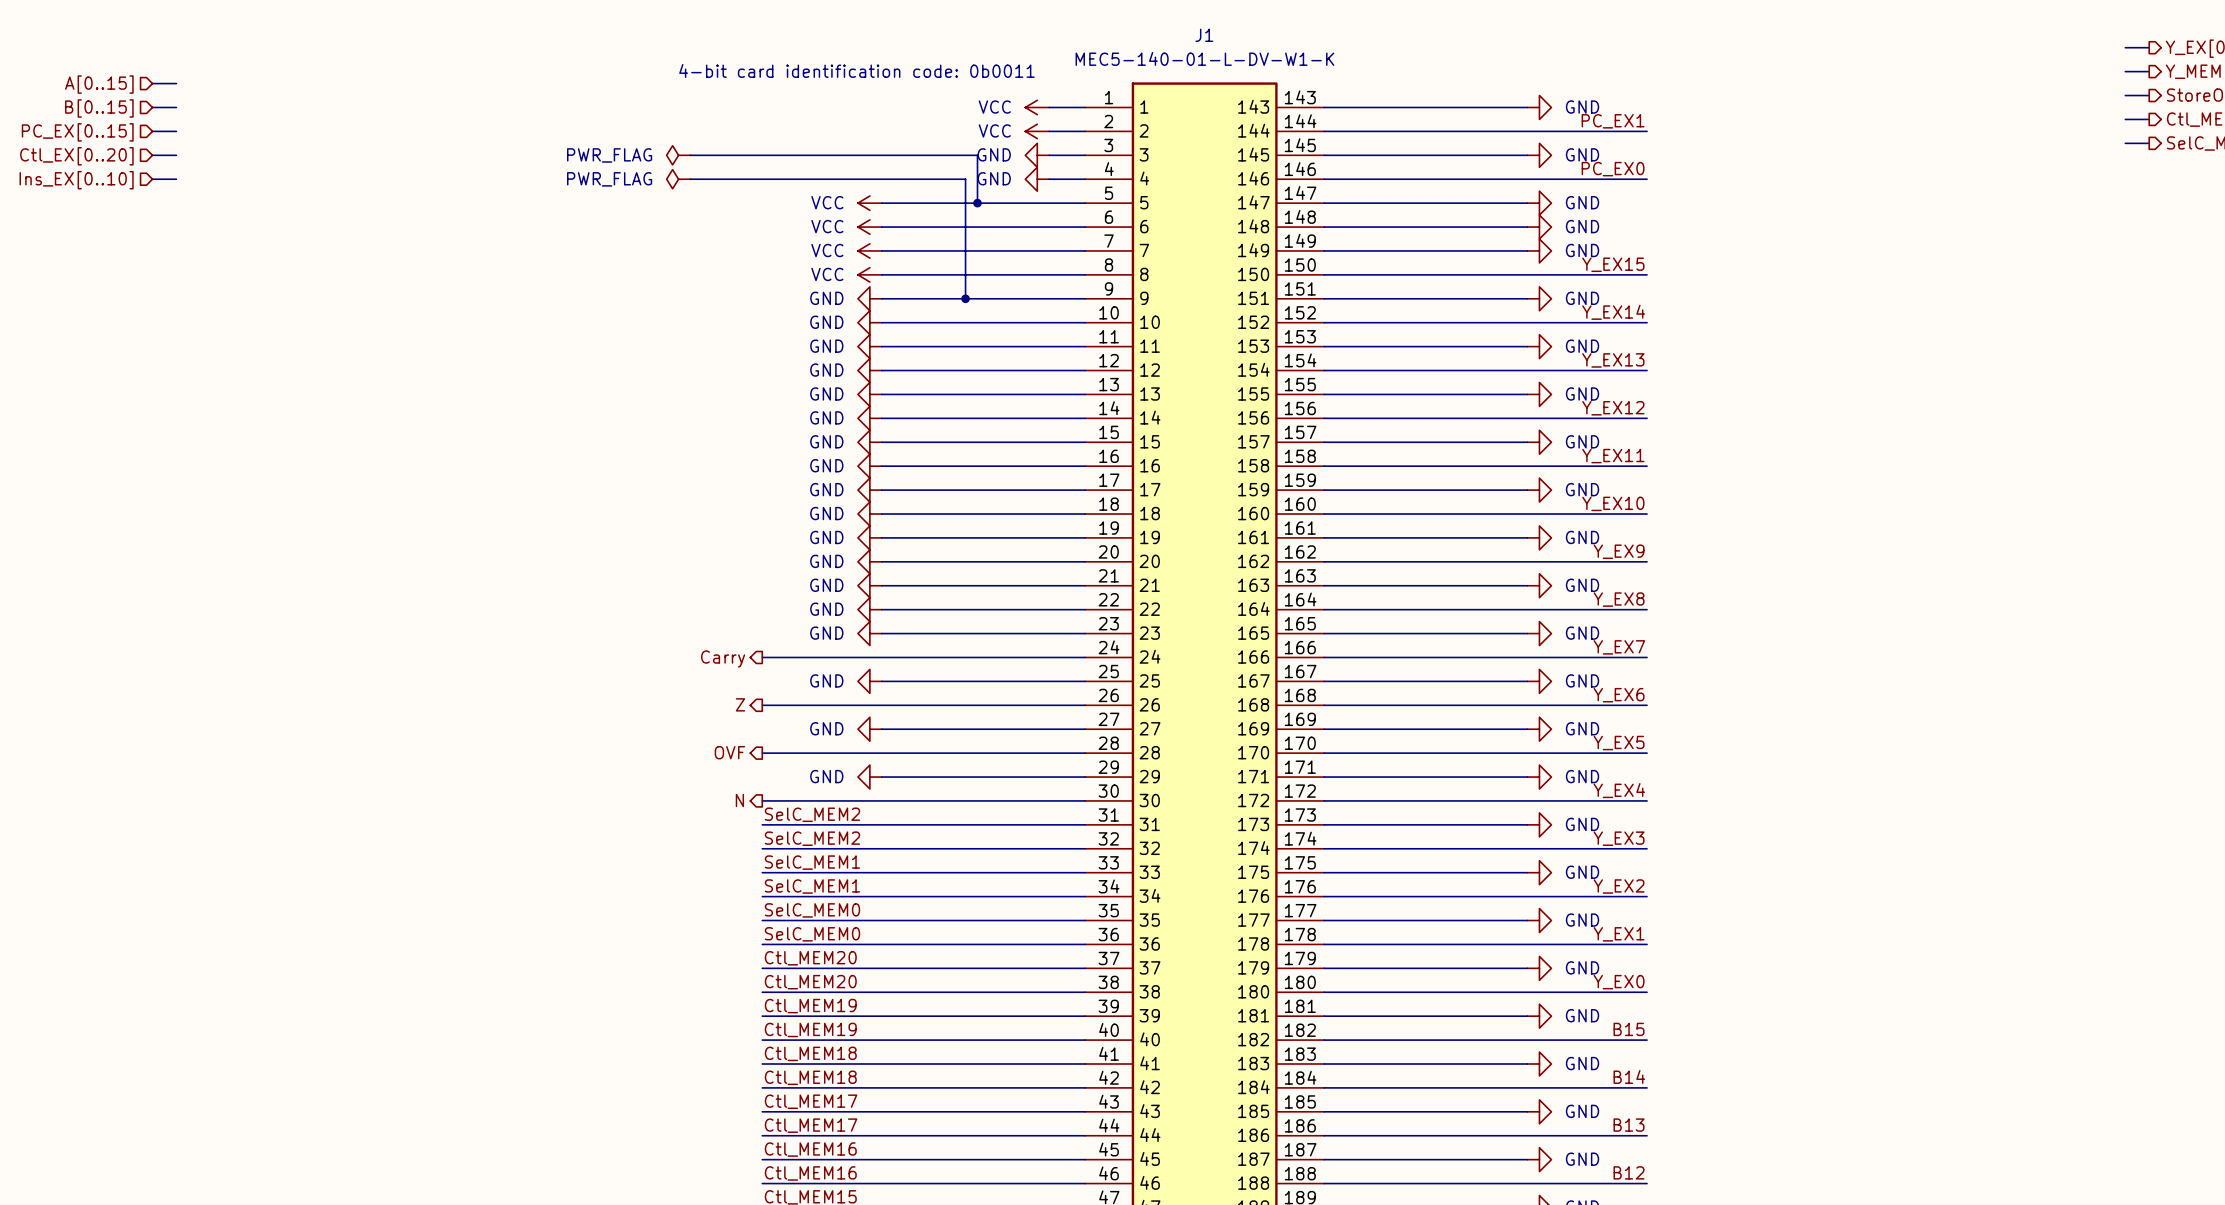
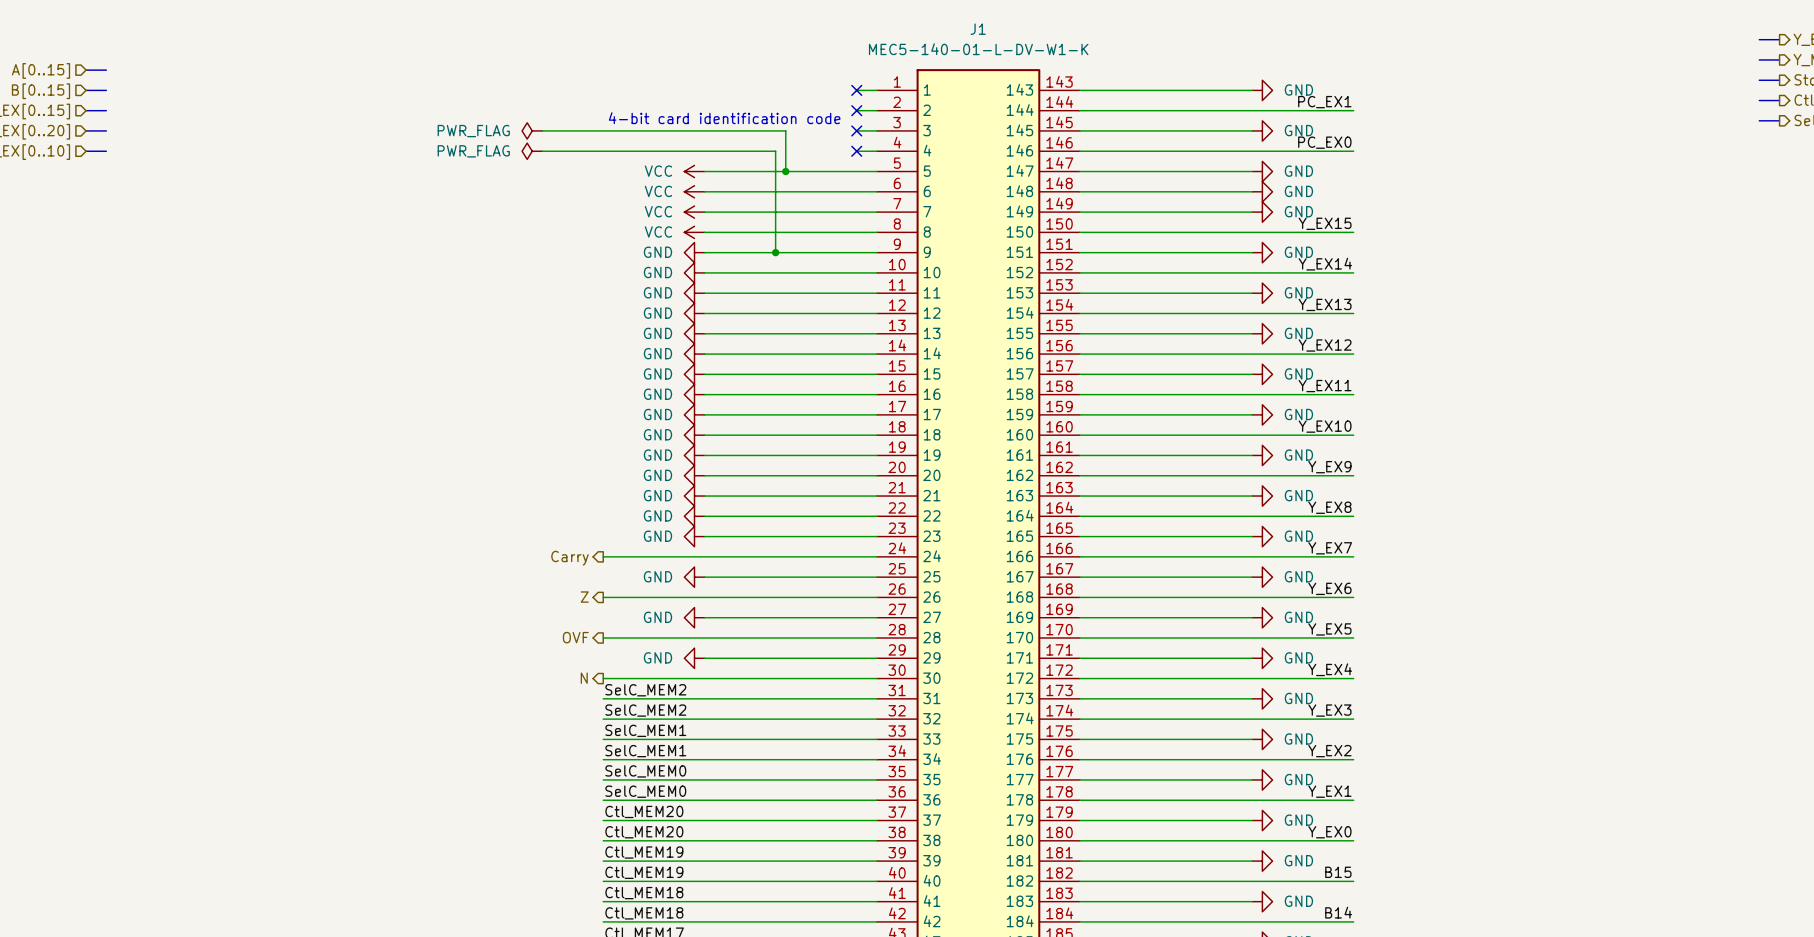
text: 4-bit card identification code: 0b0011 (856, 70) -> none
power symbol: VCC (1037, 107) -> none
wire: (1049, 107) (1061, 107) -> none
no-connect mark: none -> (856, 90)
power symbol: VCC (1037, 131) -> none
wire: (1049, 131) (1061, 131) -> none
no-connect mark: none -> (856, 110)
text: none -> 4-bit card identification code (724, 118)
power symbol: GND (1037, 155) -> none
wire: (1049, 155) (1061, 155) -> none
no-connect mark: none -> (856, 130)
power symbol: GND (1037, 179) -> none
wire: (1049, 179) (1061, 179) -> none
no-connect mark: none -> (856, 151)

